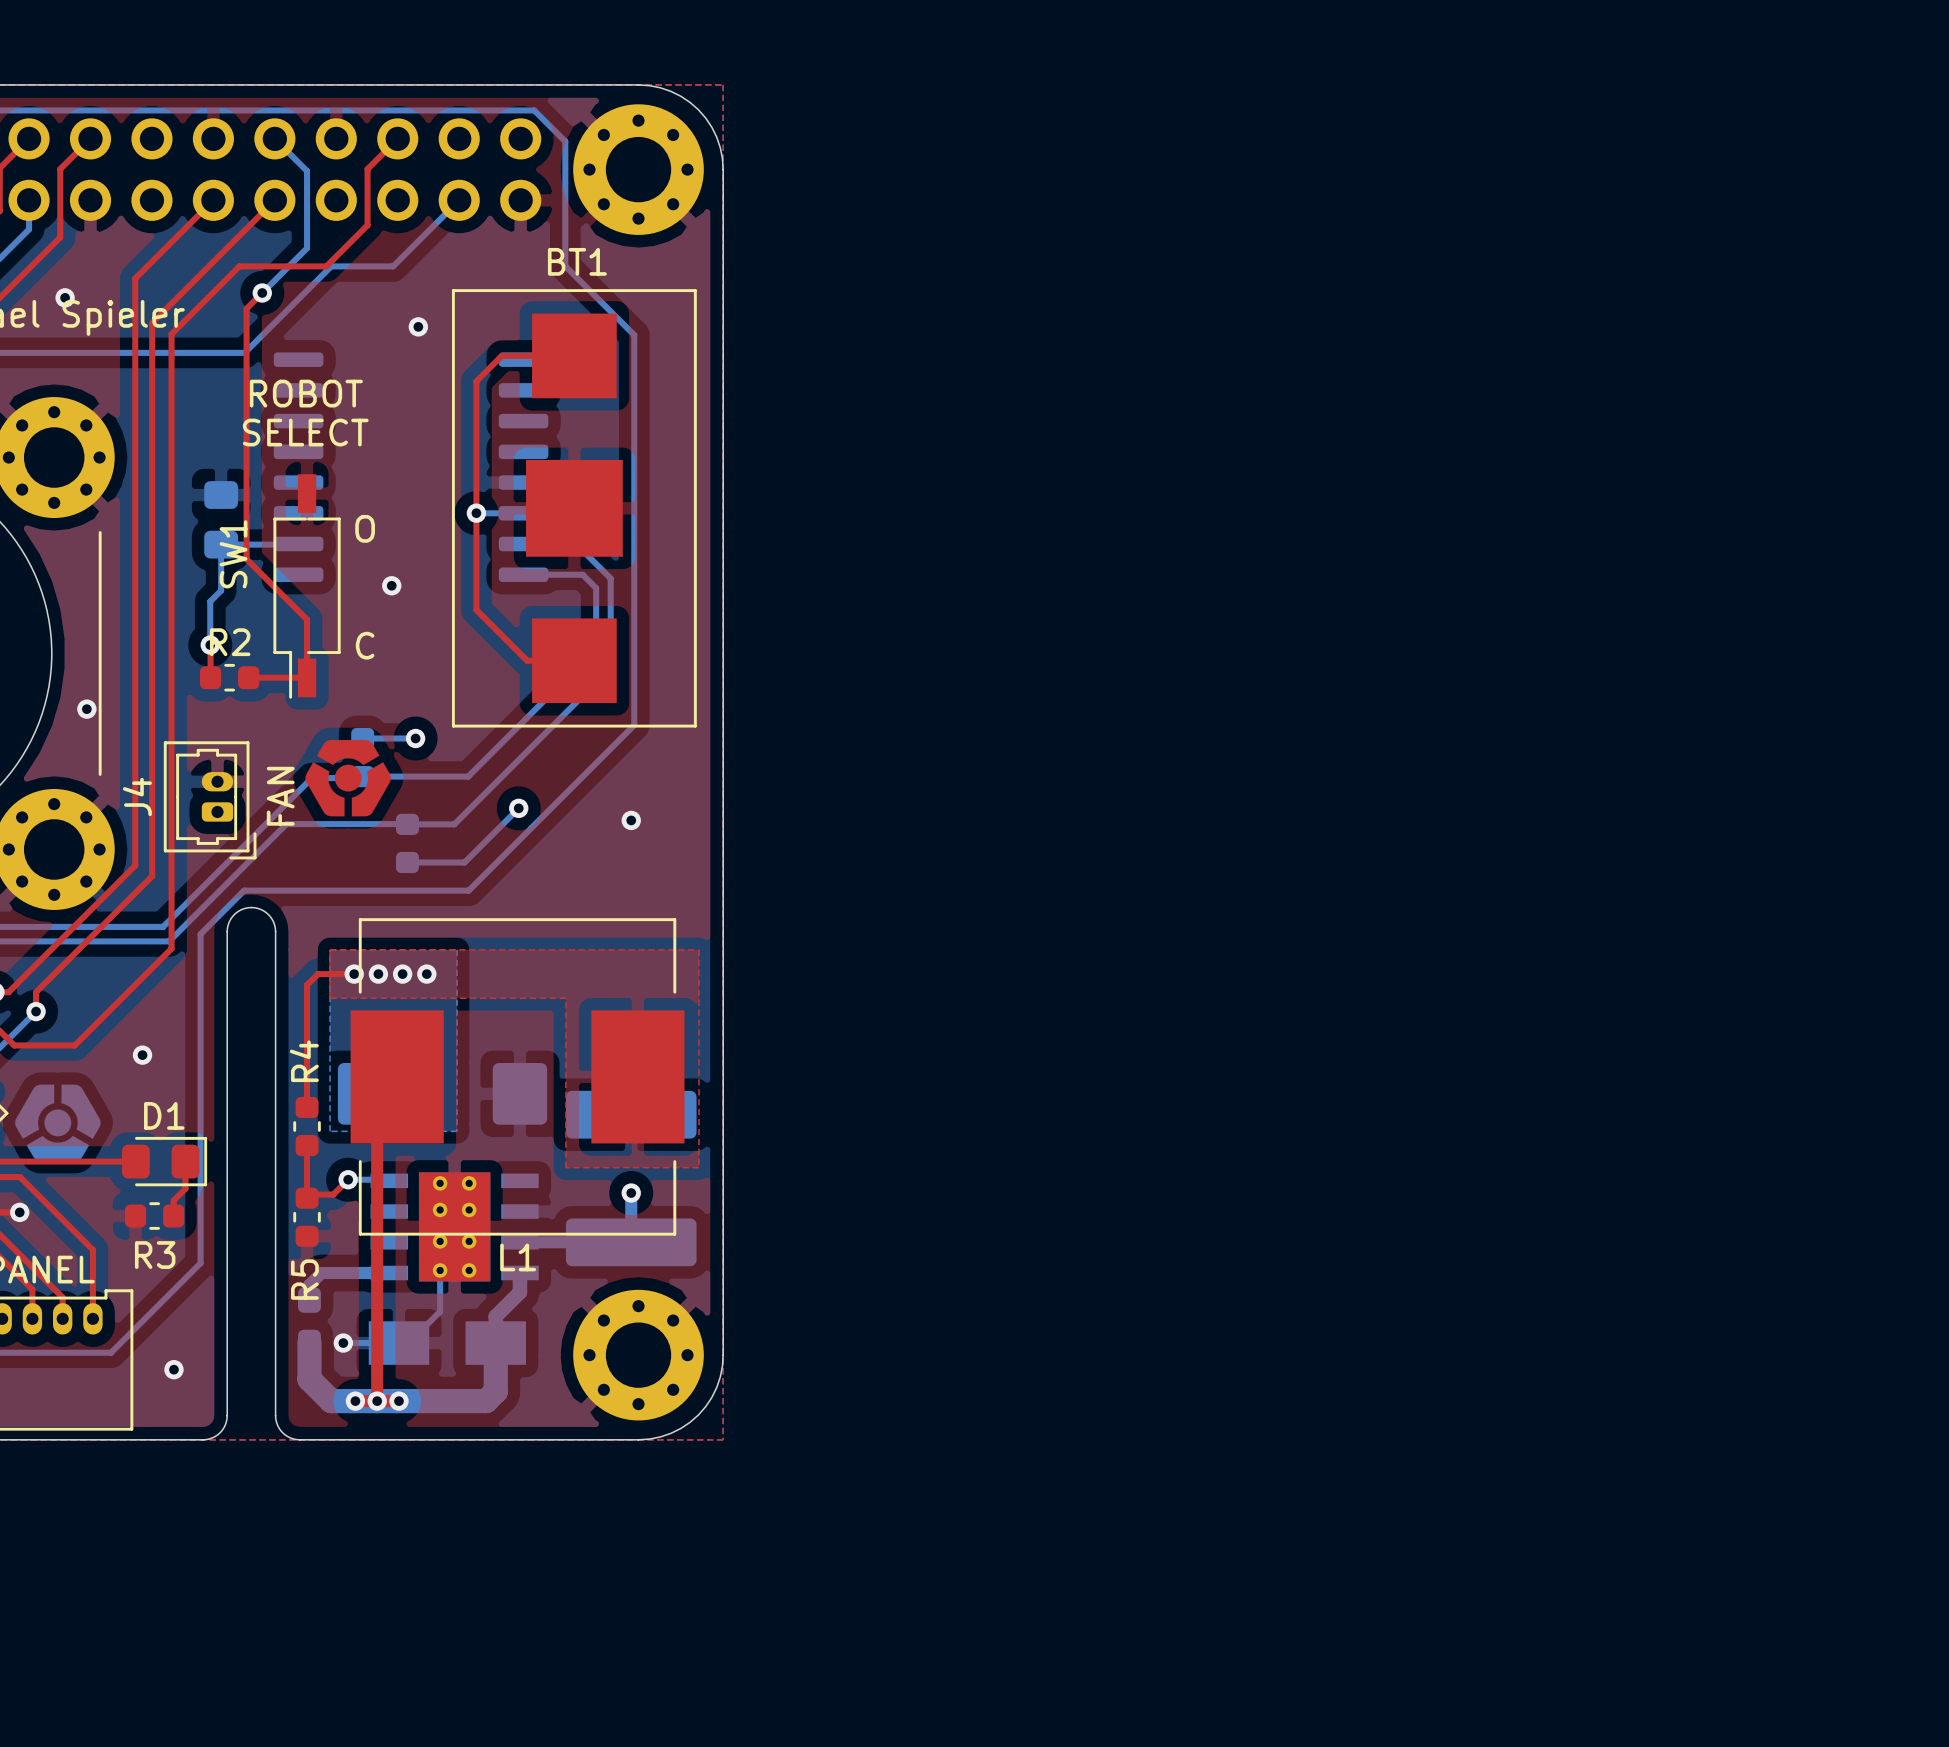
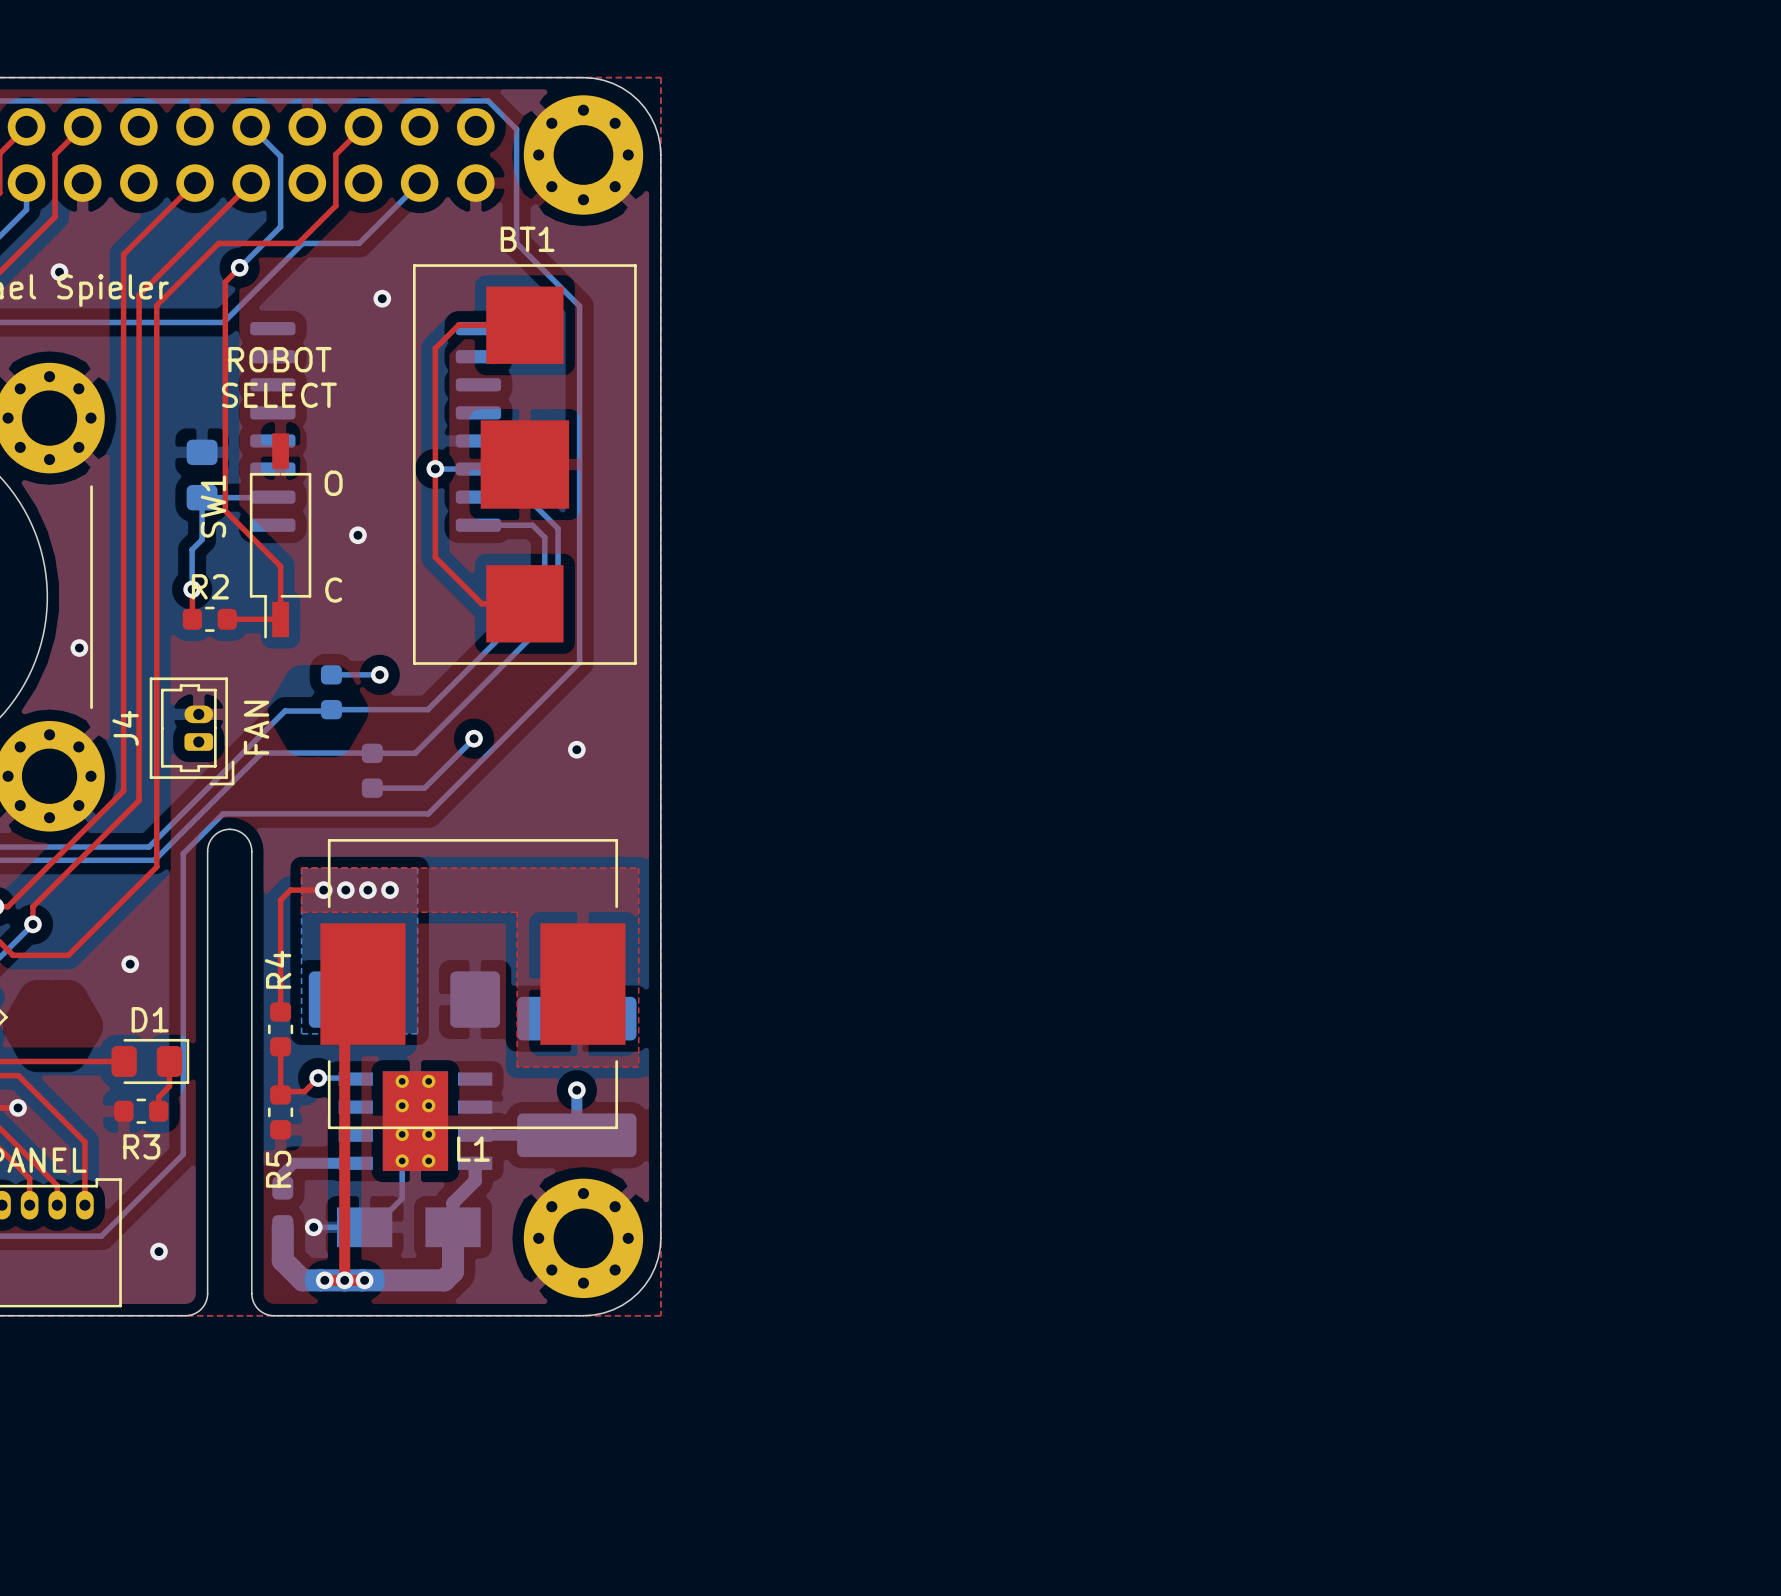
drawing: [305, 739, 391, 817] -> none
drawing: [15, 1084, 101, 1162] -> none

